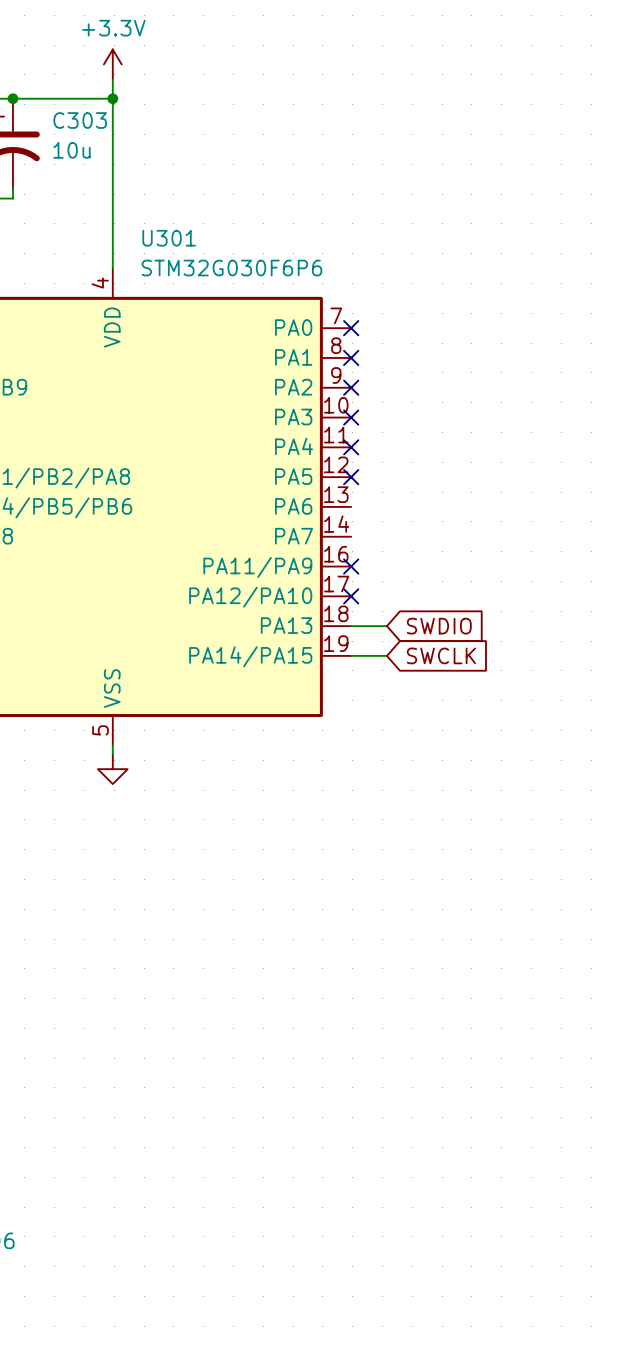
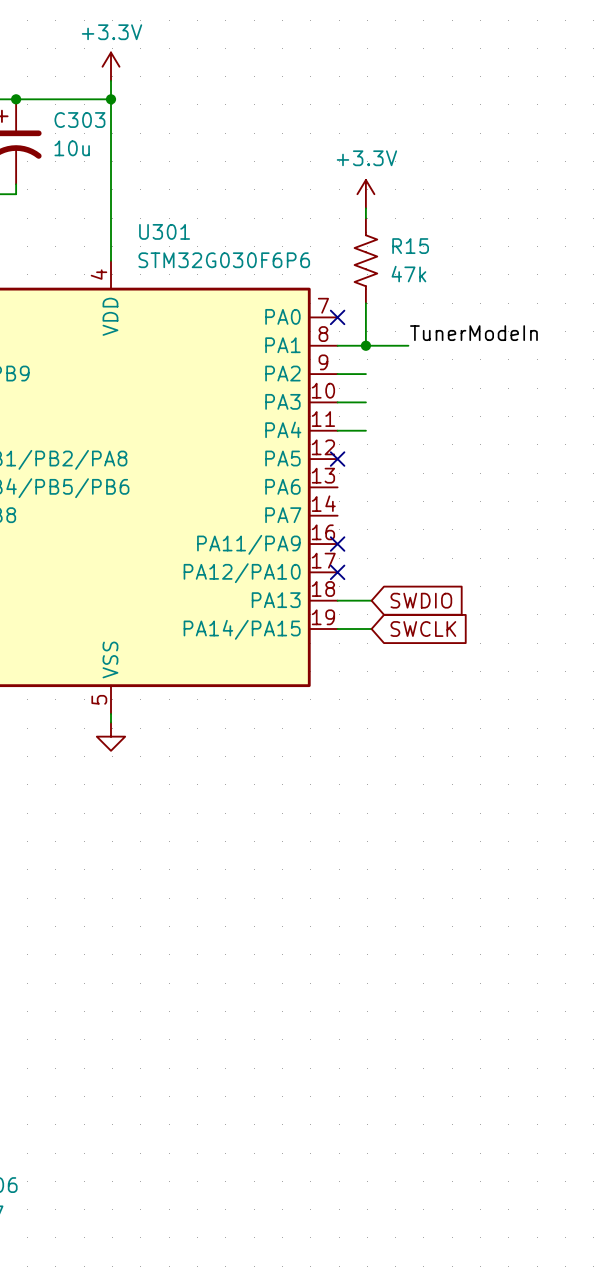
power symbol: none -> +3.3V (365, 194)
wire: none -> (365, 208) (365, 218)
R15: none -> 47k (365, 260)
wire: none -> (365, 303) (365, 345)
label: none -> TunerModeIn (473, 333)
wire: none -> (337, 345) (408, 345)
no-connect mark: (351, 357) -> none
junction: none -> (365, 345)
wire: none -> (337, 374) (365, 374)
no-connect mark: (351, 387) -> none
wire: none -> (337, 402) (365, 402)
no-connect mark: (351, 417) -> none
wire: none -> (337, 430) (365, 430)
no-connect mark: (351, 447) -> none

